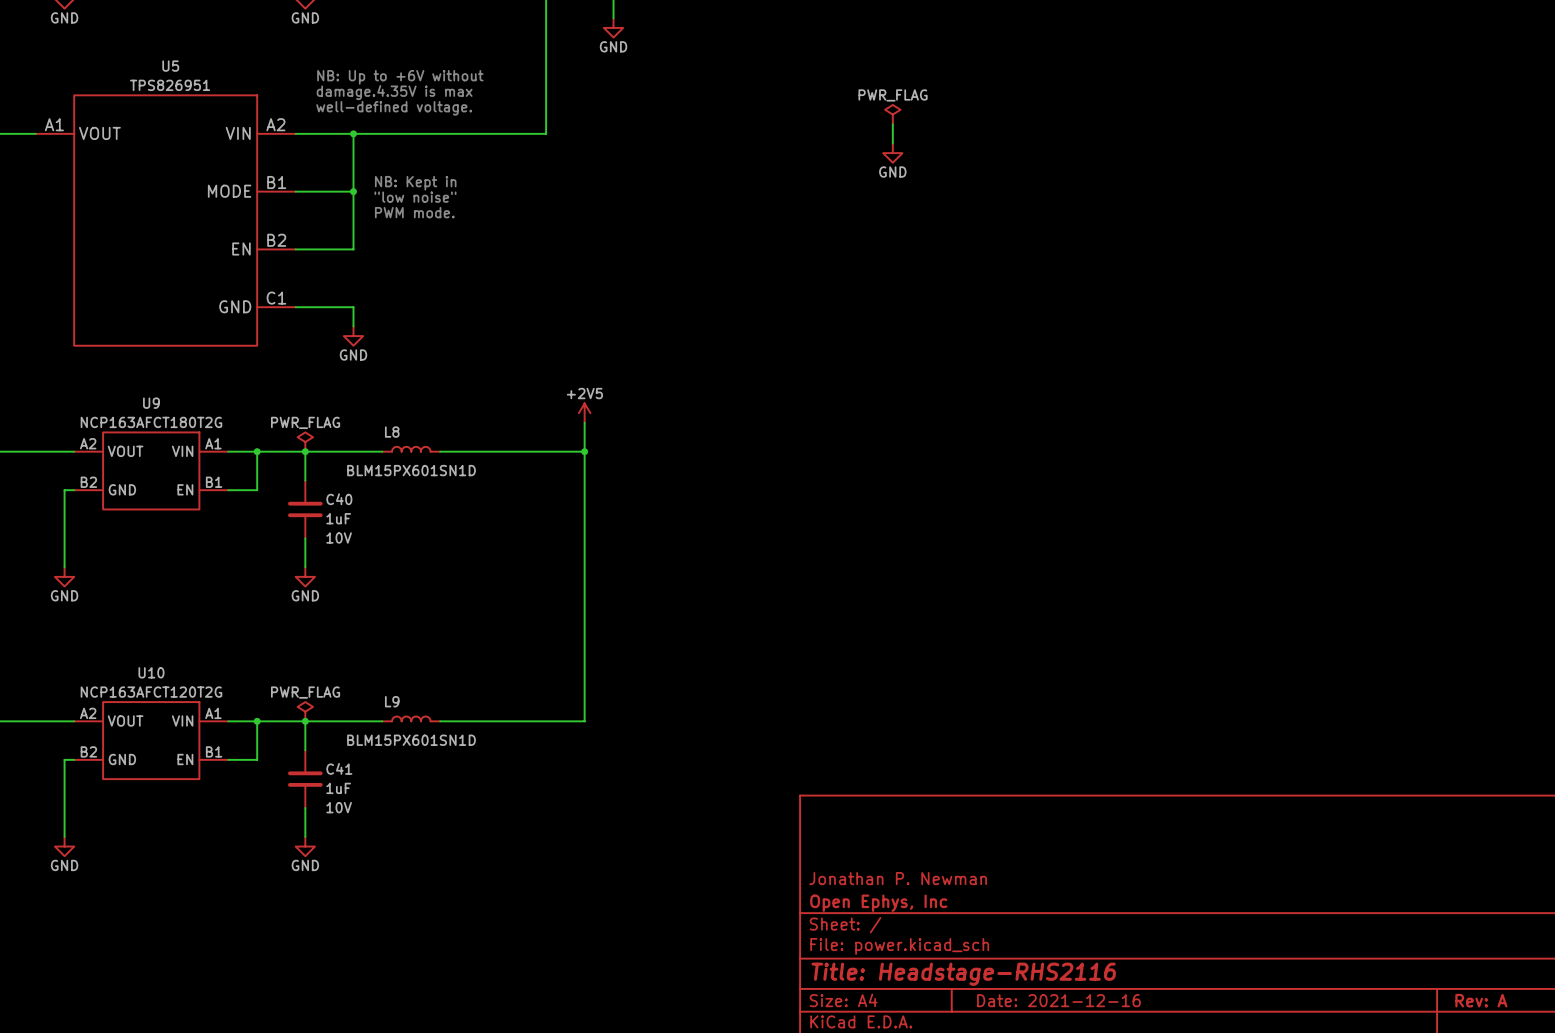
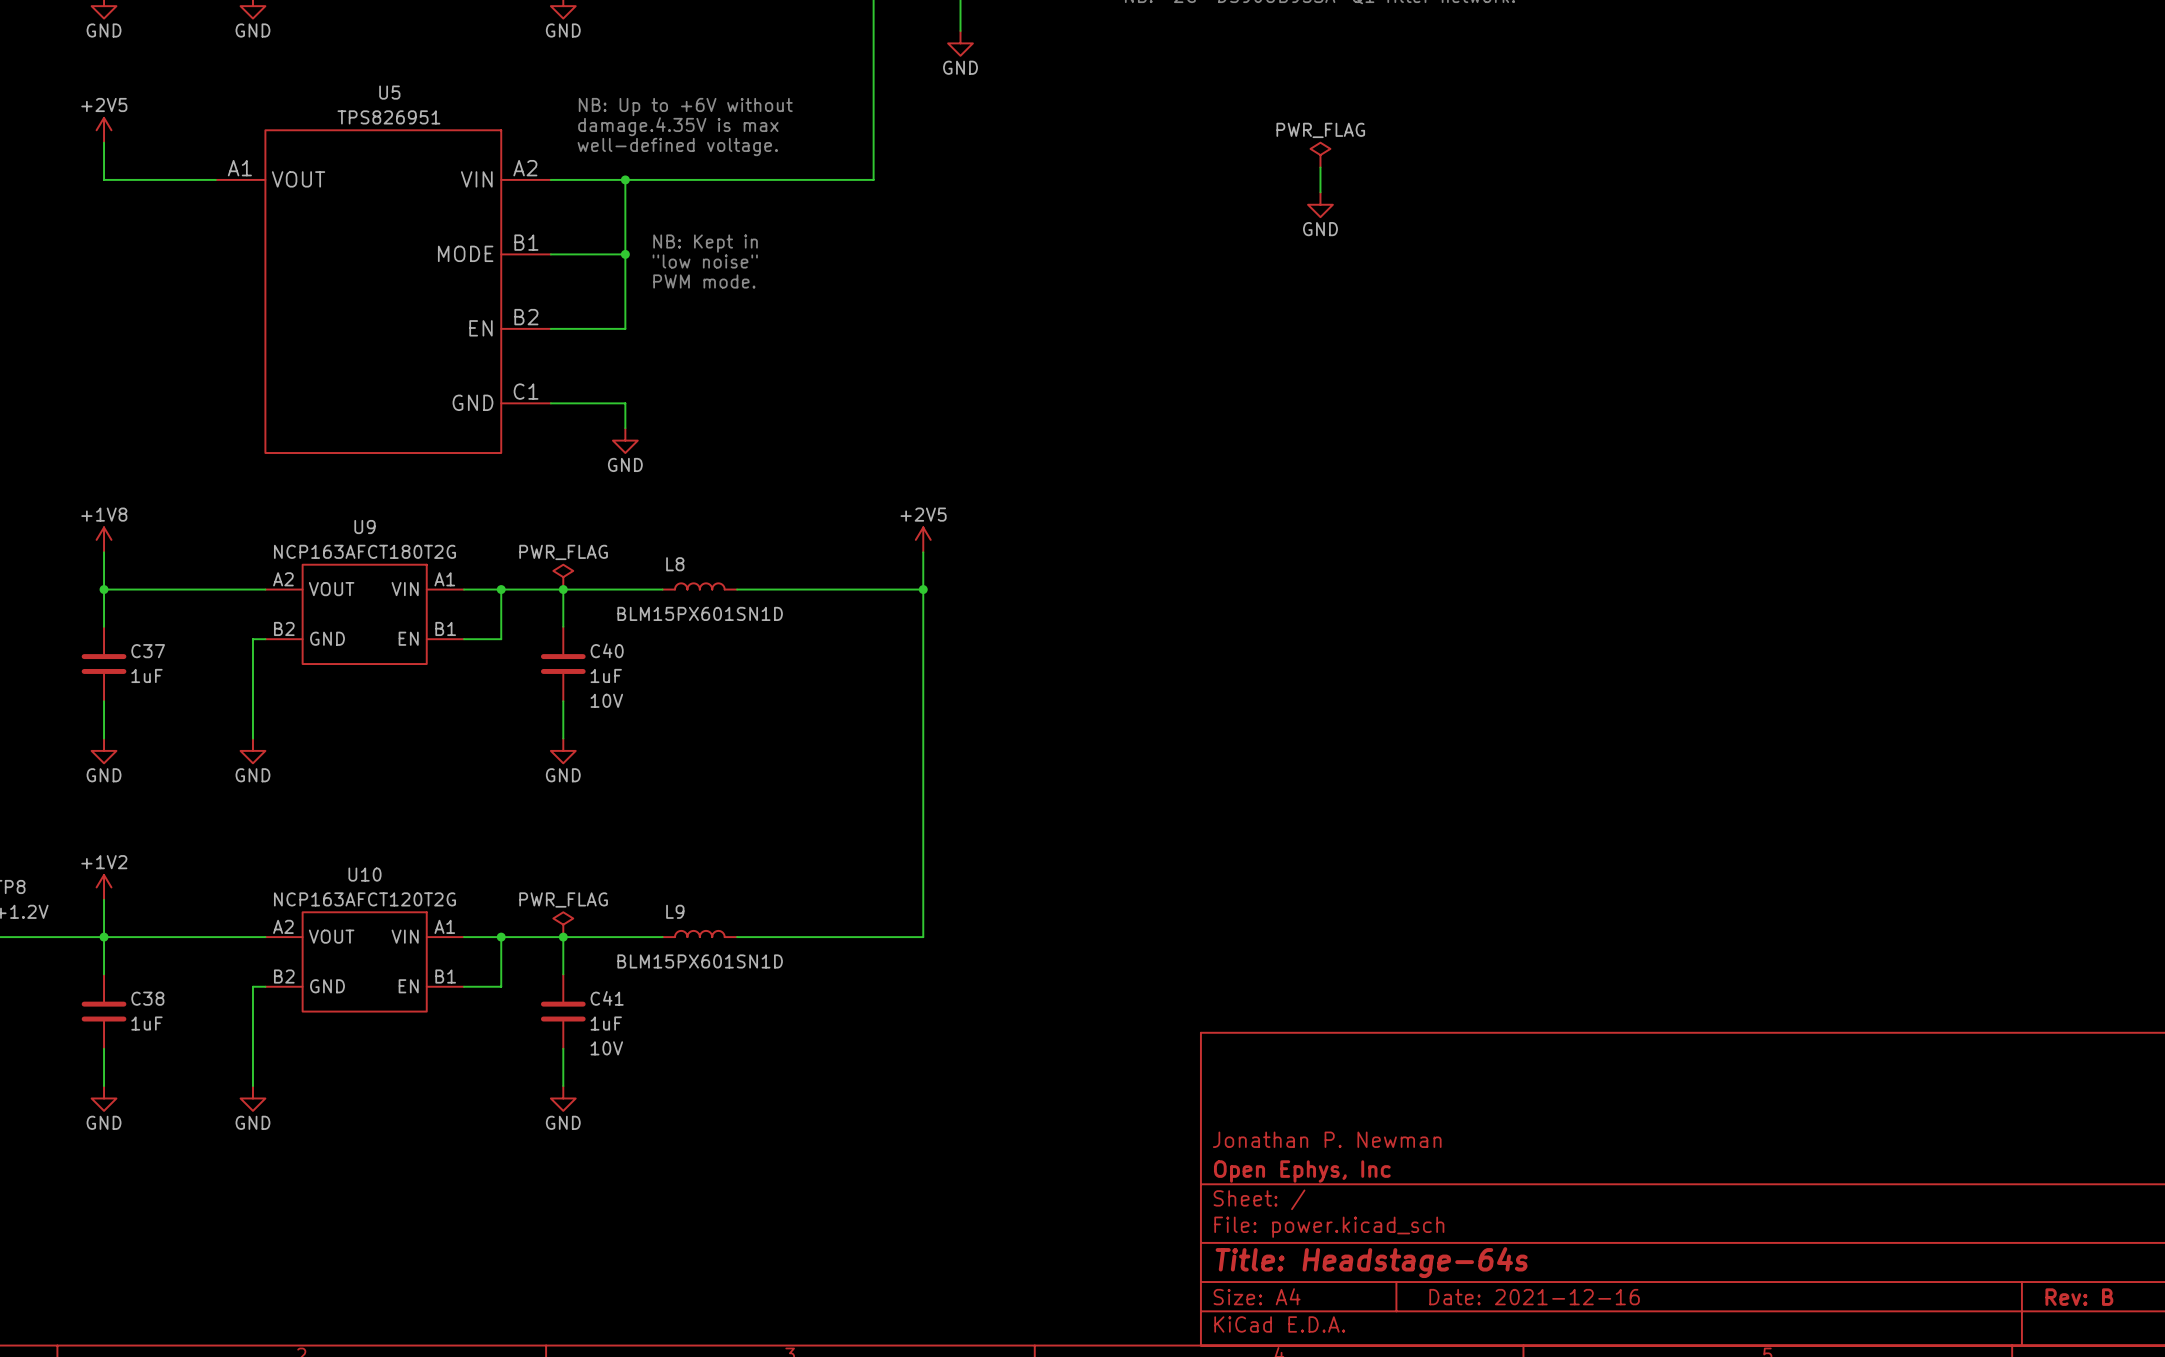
title block: Title: Headstage-RHS2116 (963, 974) -> Title: Headstage-64s (1371, 1262)
title block: Rev: A (1481, 1000) -> Rev: B (2079, 1297)

